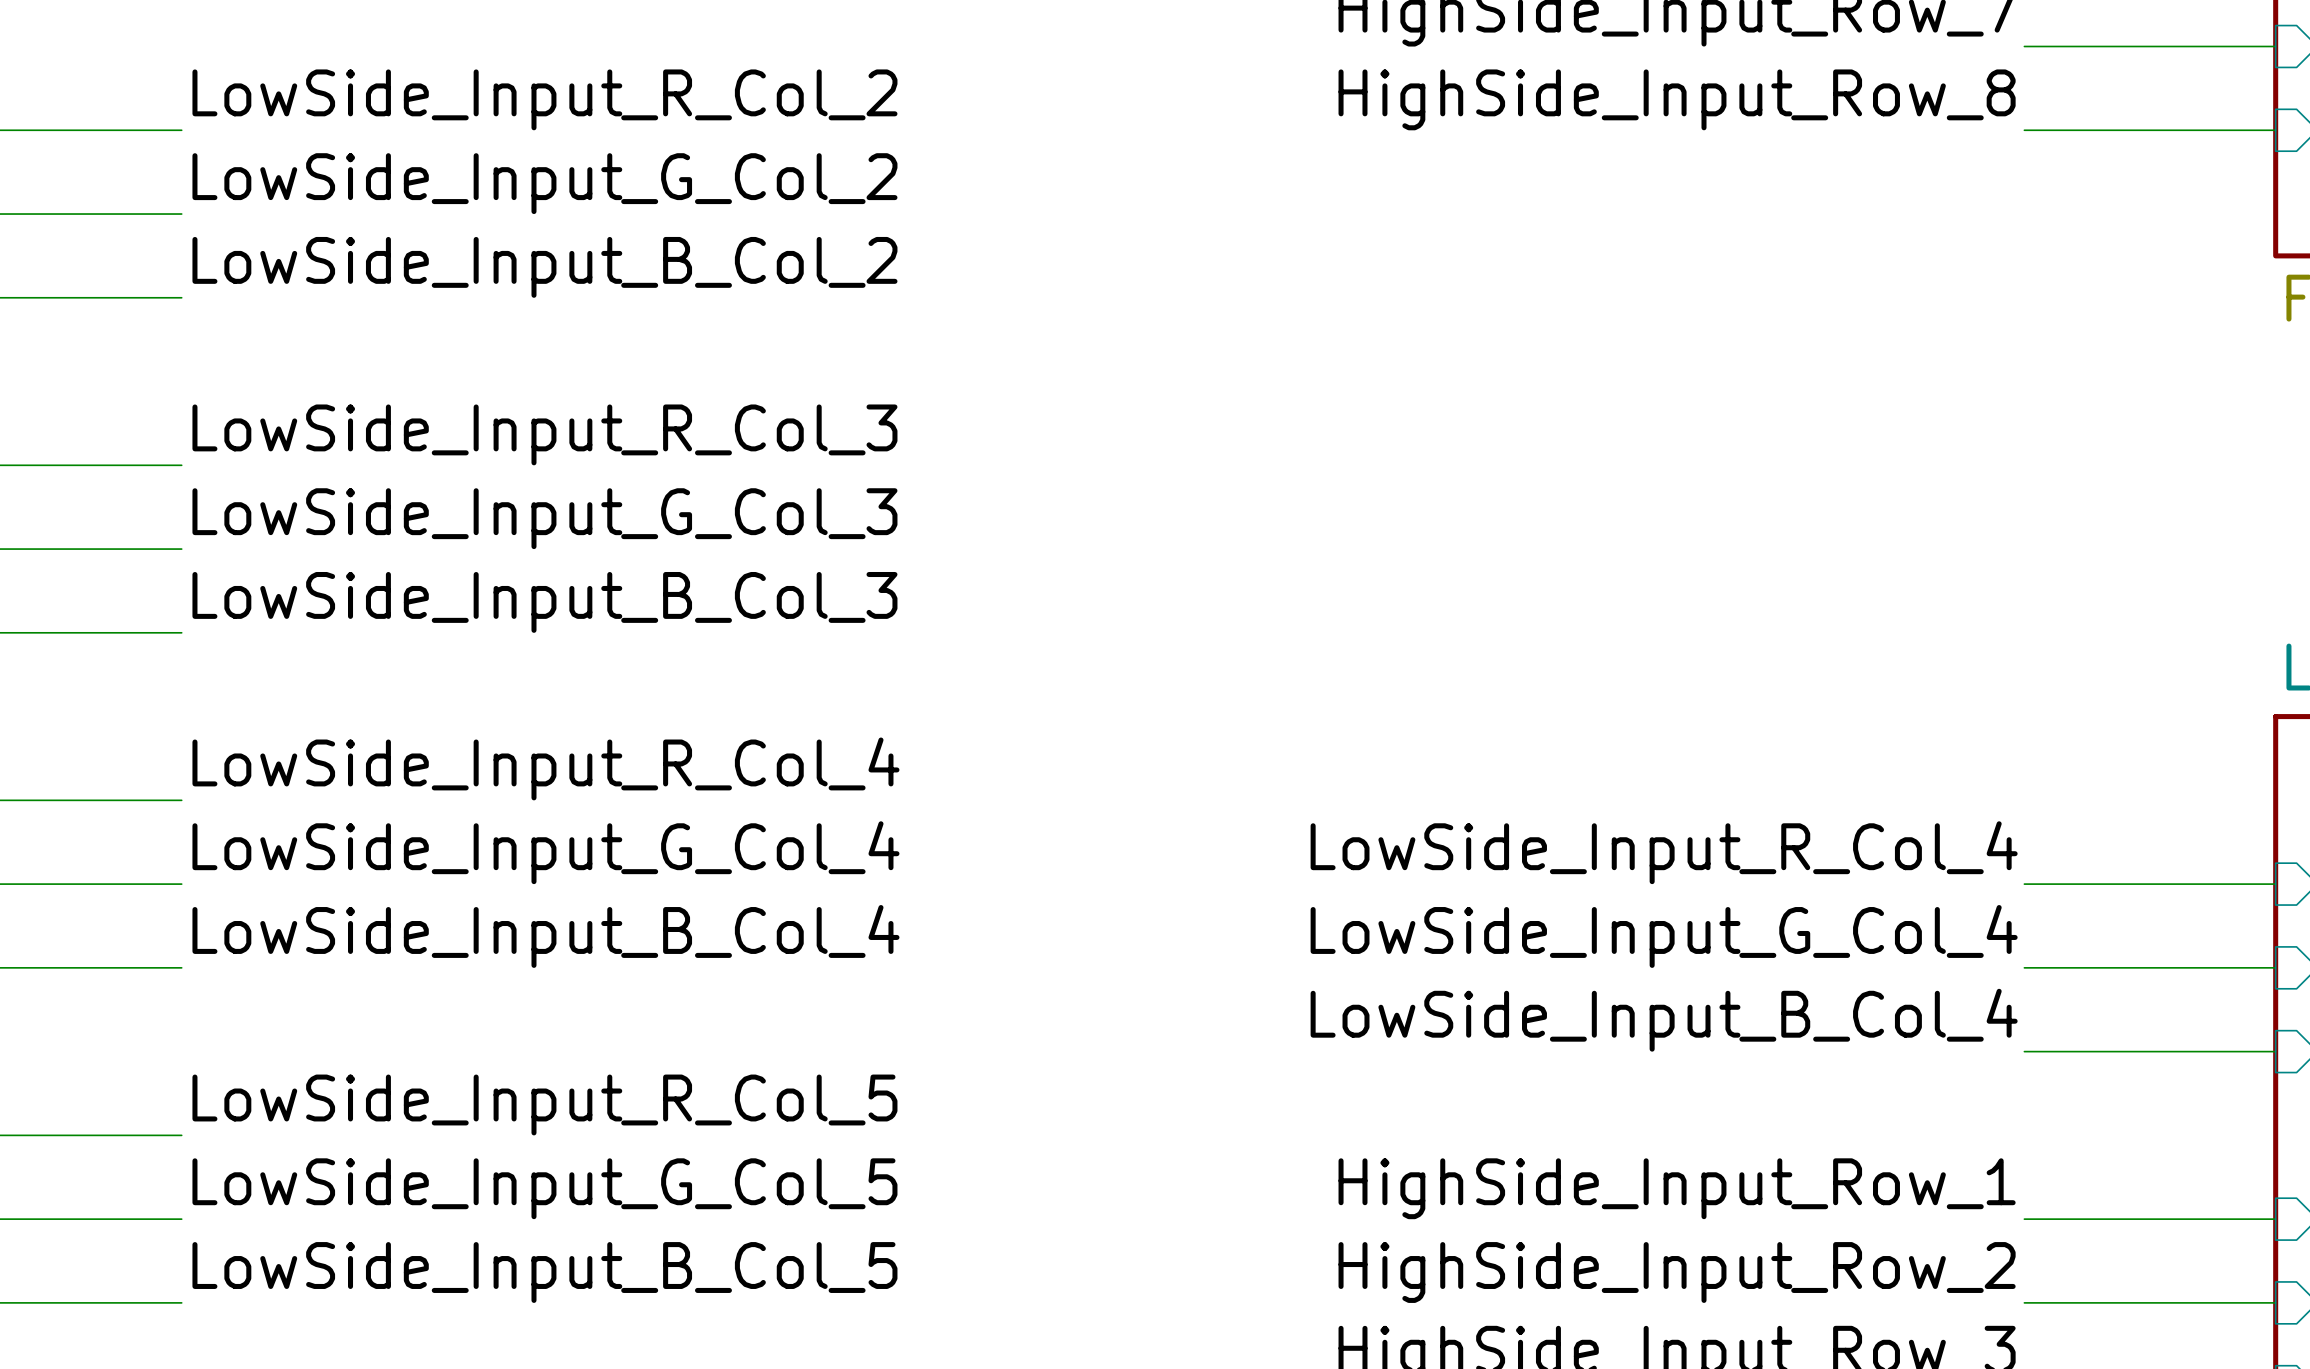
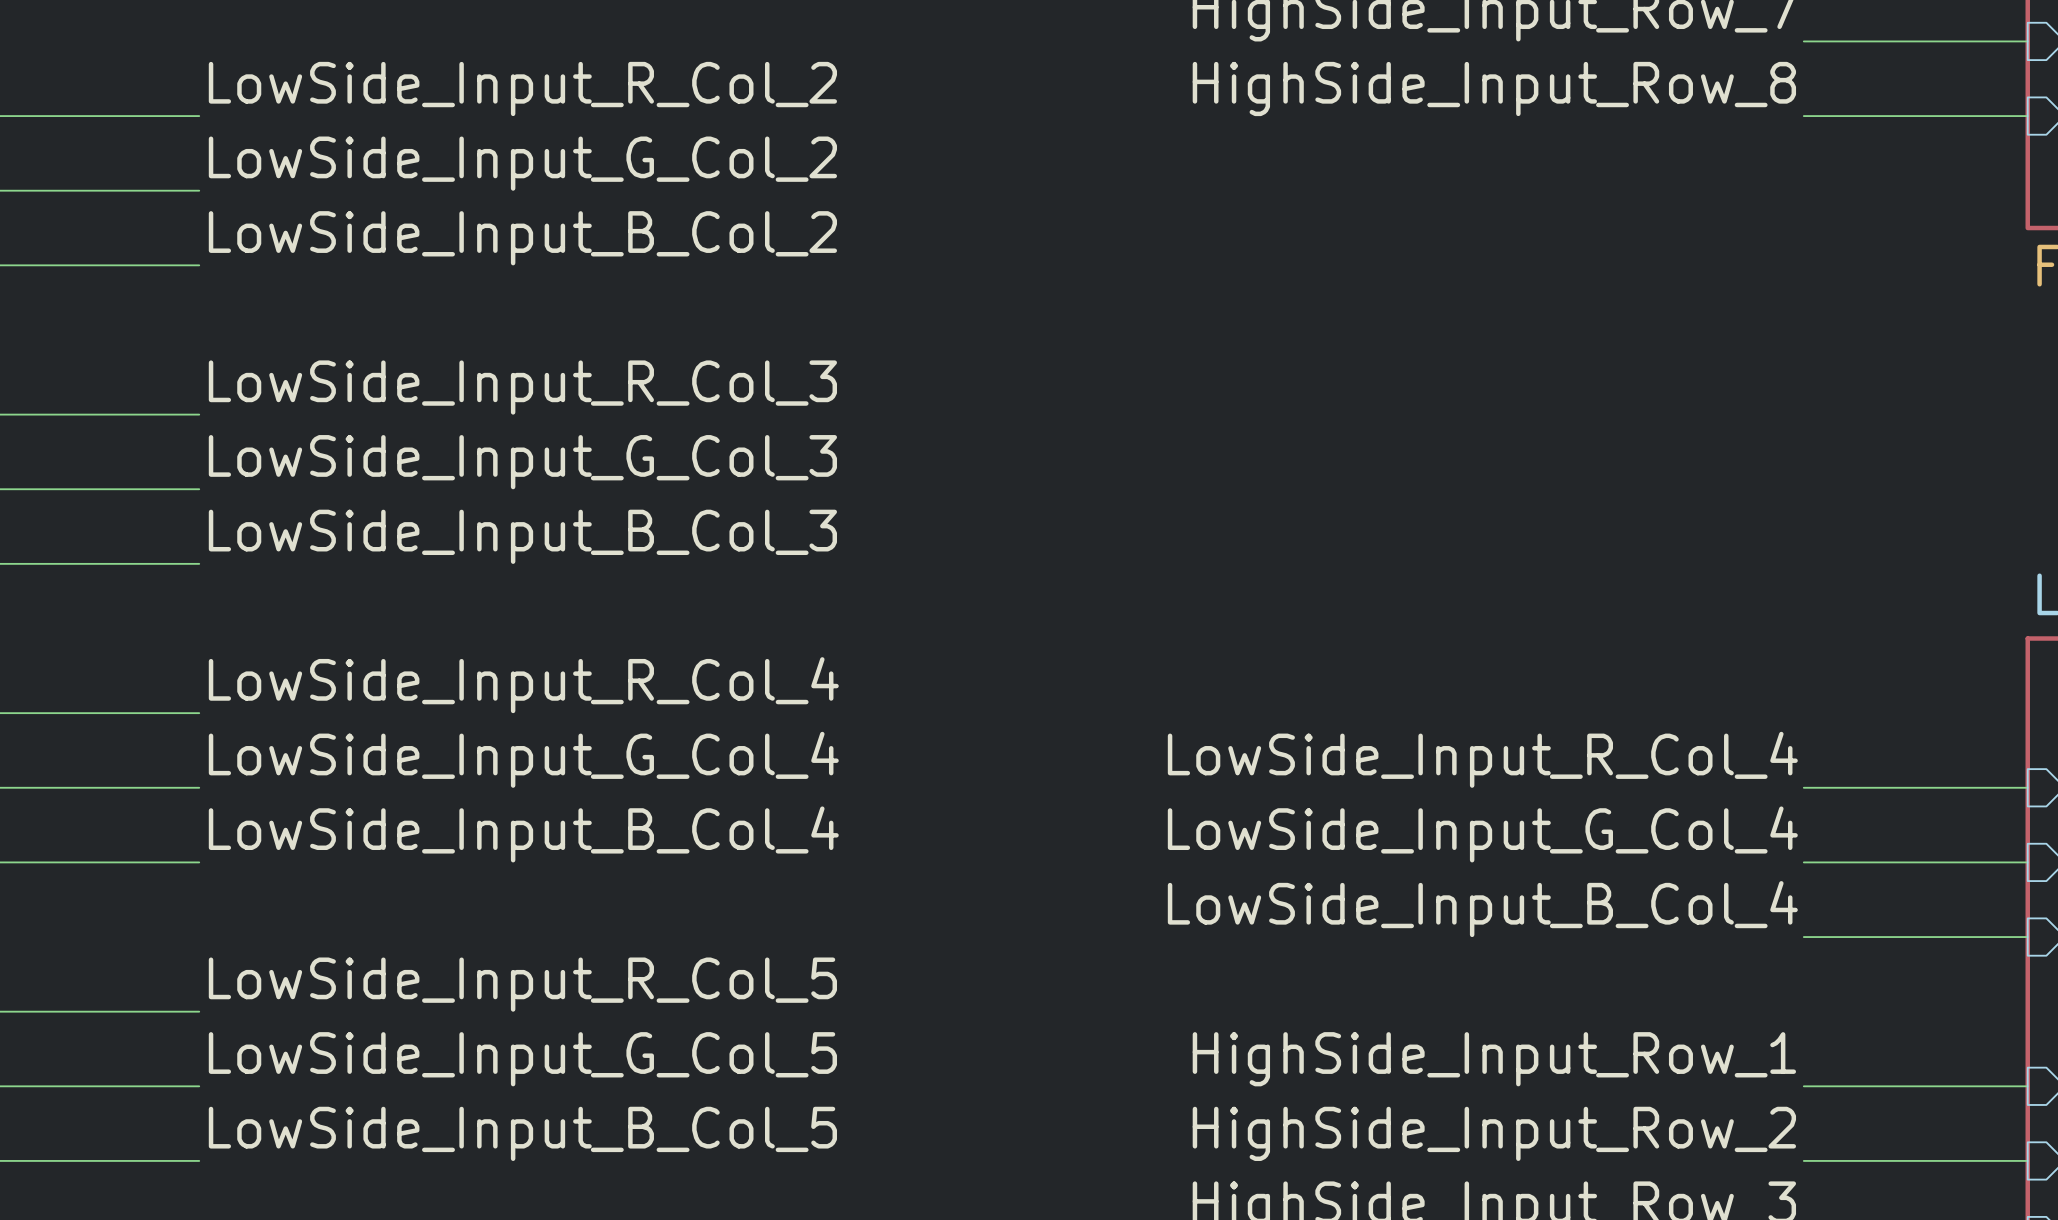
label position: LowSide_Input_R_Col_2 (544, 99) -> LowSide_Input_R_Col_2 (522, 88)
wire: none -> (161, 116) (199, 116)
label position: LowSide_Input_G_Col_2 (544, 183) -> LowSide_Input_G_Col_2 (522, 163)
wire: none -> (161, 190) (199, 190)
label position: LowSide_Input_B_Col_2 (544, 267) -> LowSide_Input_B_Col_2 (522, 238)
wire: none -> (161, 265) (199, 265)
label position: LowSide_Input_R_Col_3 (544, 434) -> LowSide_Input_R_Col_3 (522, 387)
wire: none -> (161, 414) (199, 414)
label position: LowSide_Input_G_Col_3 (544, 518) -> LowSide_Input_G_Col_3 (522, 462)
wire: none -> (161, 489) (199, 489)
label position: LowSide_Input_B_Col_3 (544, 602) -> LowSide_Input_B_Col_3 (522, 536)
wire: none -> (161, 563) (199, 563)
label position: LowSide_Input_R_Col_4 (545, 768) -> LowSide_Input_R_Col_4 (523, 685)
wire: none -> (161, 713) (199, 713)
label position: LowSide_Input_G_Col_4 (545, 852) -> LowSide_Input_G_Col_4 (523, 759)
wire: none -> (161, 787) (199, 787)
label position: LowSide_Input_B_Col_4 (545, 936) -> LowSide_Input_B_Col_4 (523, 834)
wire: none -> (161, 862) (199, 862)
label position: LowSide_Input_R_Col_5 (544, 1104) -> LowSide_Input_R_Col_5 (522, 984)
wire: none -> (161, 1011) (199, 1011)
label position: LowSide_Input_G_Col_5 (544, 1188) -> LowSide_Input_G_Col_5 (522, 1059)
wire: none -> (161, 1086) (199, 1086)
label position: LowSide_Input_B_Col_5 (544, 1272) -> LowSide_Input_B_Col_5 (522, 1133)
wire: none -> (161, 1160) (199, 1160)

